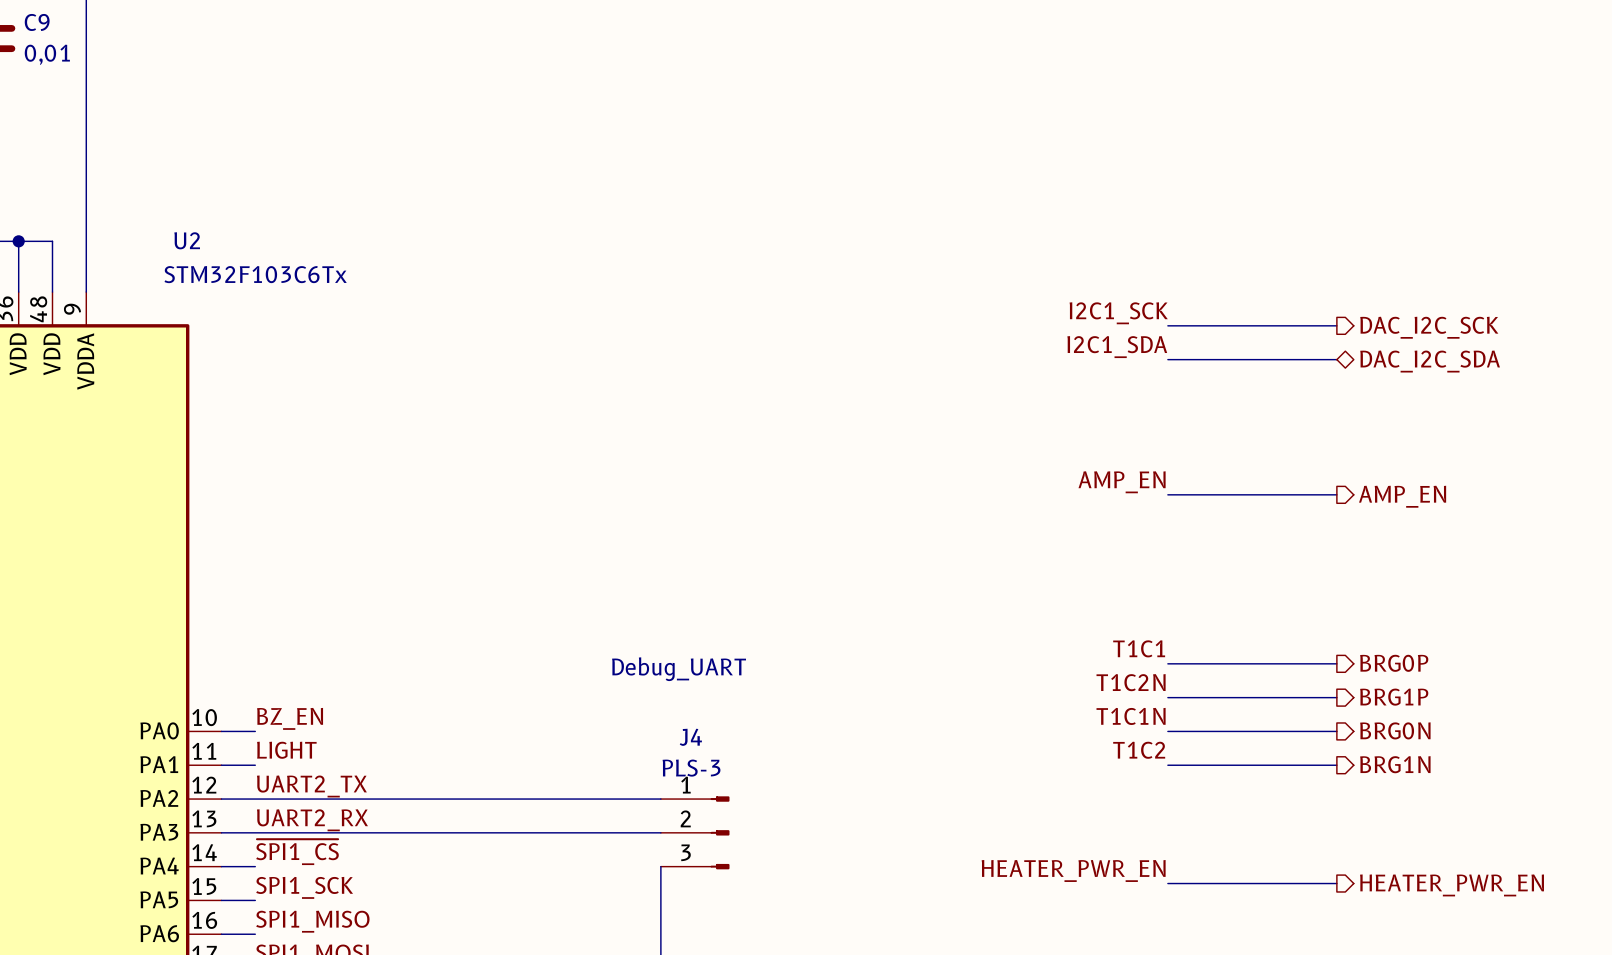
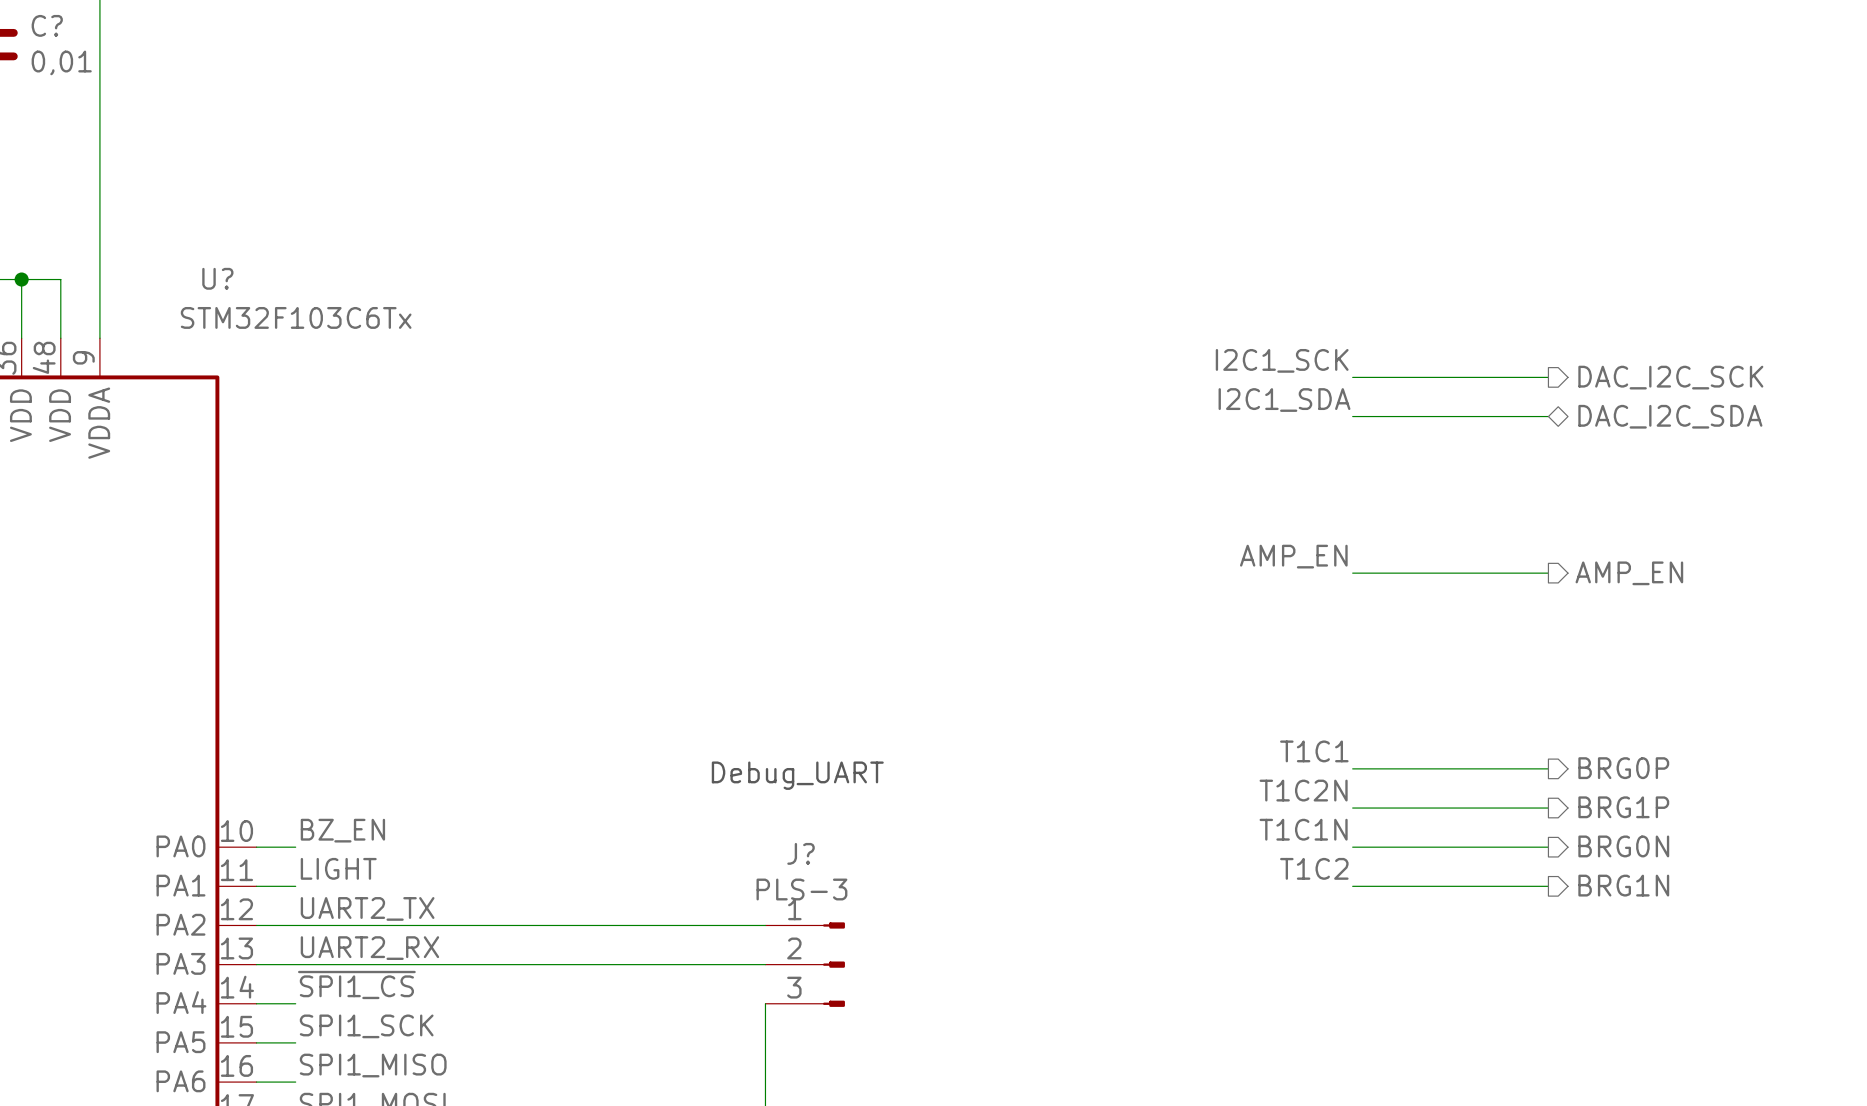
C9 name: C9 (37, 22) -> C? (47, 25)
U2 name: U2 (187, 240) -> U? (217, 278)
J4 name: J4 (690, 737) -> J? (801, 853)
label: HEATER_PWR_EN (1073, 870) -> none
wire: (1167, 883) (1336, 883) -> none
hierarchical label: HEATER_PWR_EN (1452, 885) -> none

